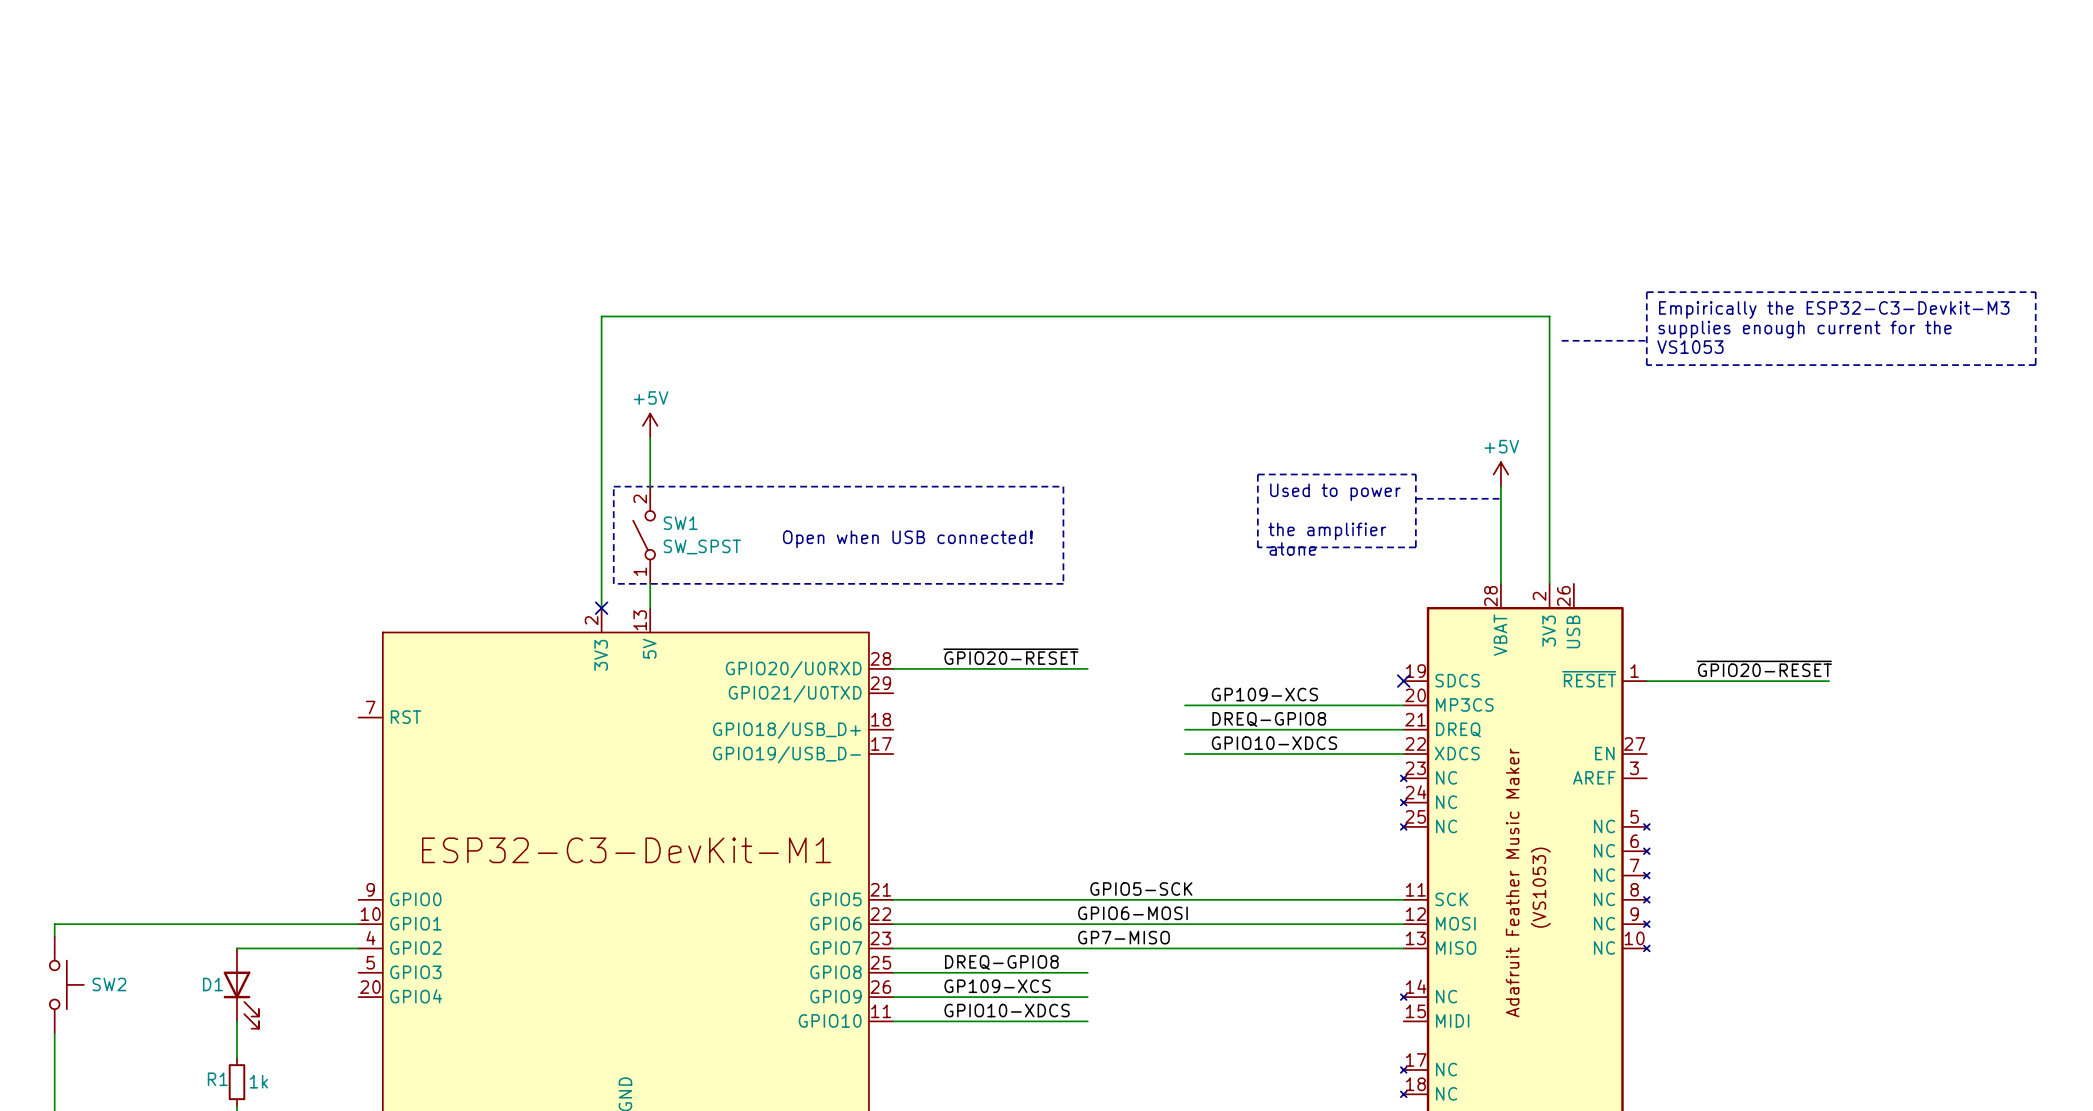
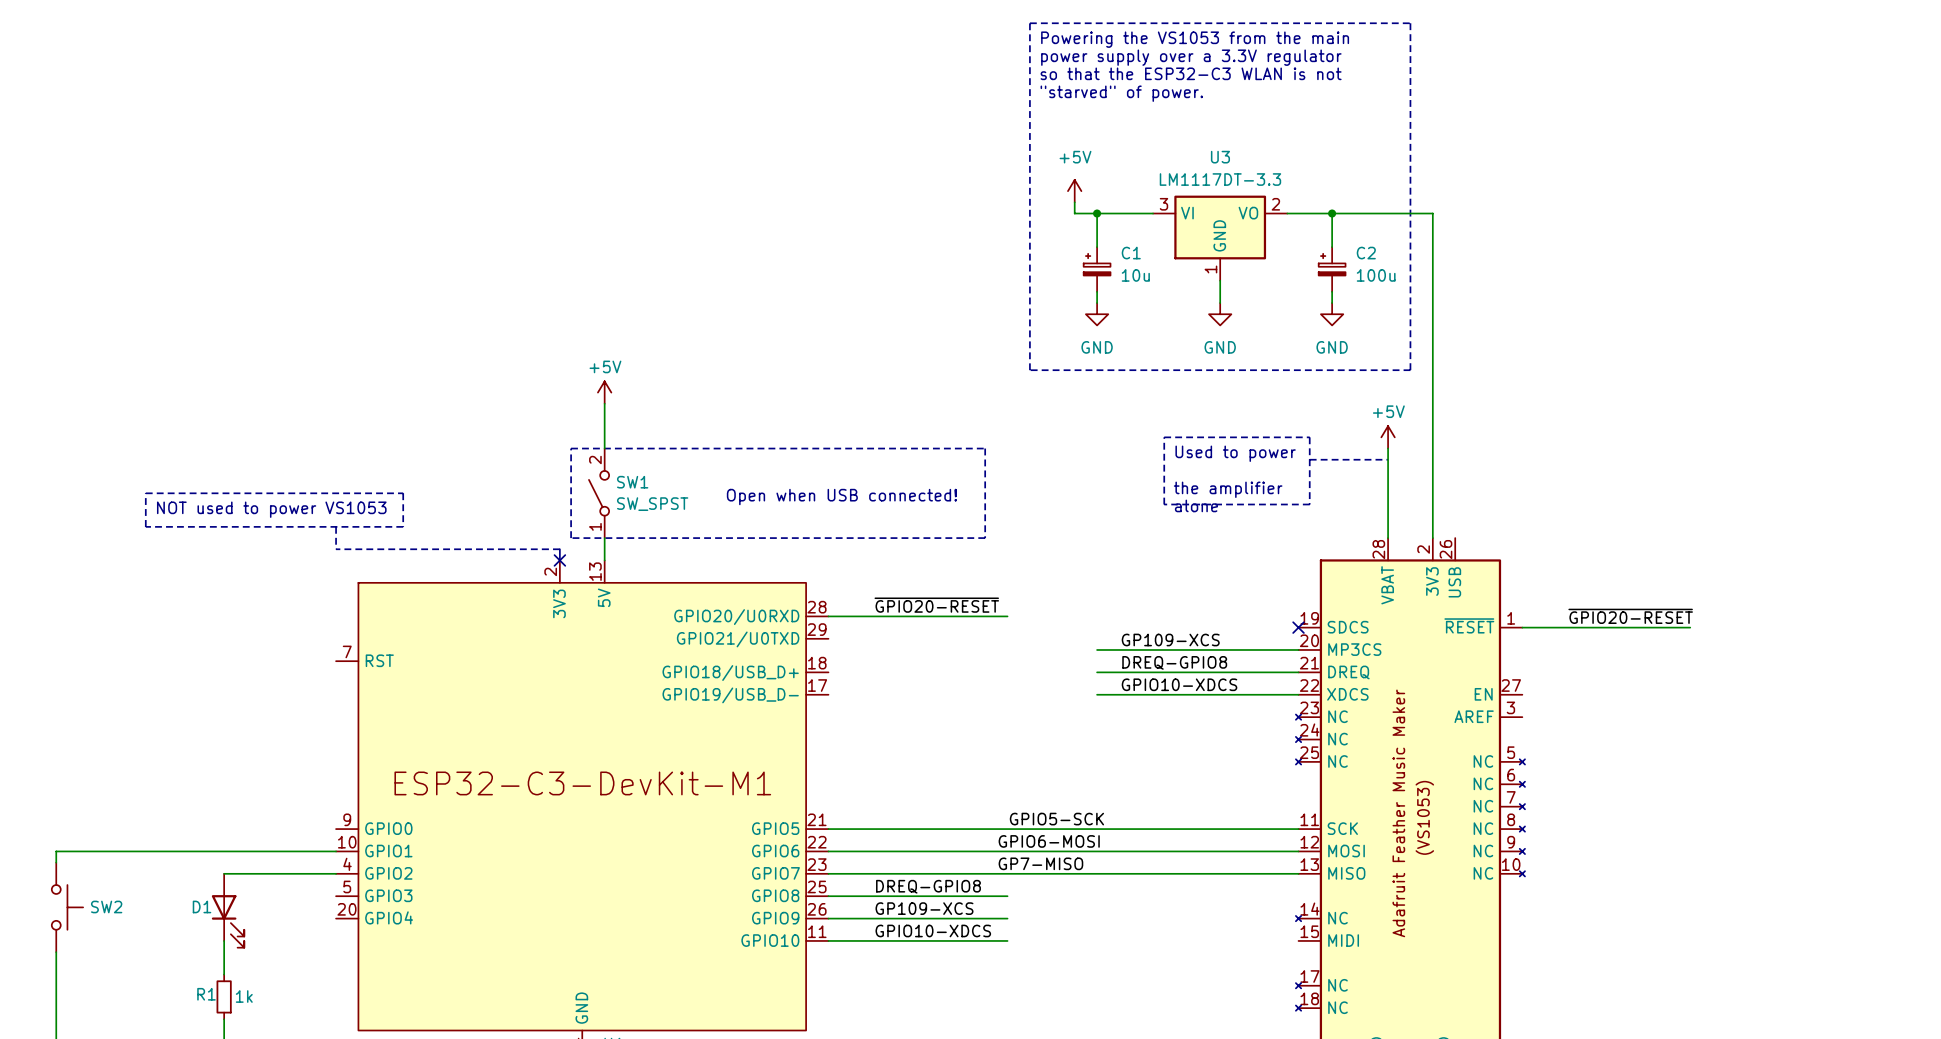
line: none -> (1029, 23) (1410, 23) (1410, 370) (1029, 370) (1029, 23)
text: none -> Powering the VS1053 from the main (1195, 39)
text: none -> power supply over a 3.3V regulator (1191, 57)
text: none -> so that the ESP32-C3 WLAN is not (1191, 73)
text: none -> "starved" of power. (1121, 93)
power symbol: none -> +5V (1074, 191)
wire: none -> (1074, 202) (1074, 213) (1153, 213)
wire: none -> (1097, 213) (1097, 247)
junction: none -> (1097, 213)
wire: none -> (1332, 213) (1332, 247)
junction: none -> (1332, 213)
U3: none -> LM1117DT-3.3 (1220, 238)
C1: none -> 10u (1097, 269)
C2: none -> 100u (1332, 269)
line: (1646, 292) (2035, 292) (2035, 365) (1646, 365) (1646, 292) -> none
wire: none -> (1220, 280) (1220, 303)
text: Empirically the ESP32-C3-Devkit-M3 (1834, 309) -> none
wire: none -> (1097, 291) (1097, 303)
wire: none -> (1332, 291) (1332, 303)
wire: (1549, 316) (601, 316) (601, 608) -> (1432, 291) (1432, 213) (1287, 213)
text: supplies enough current for the (1805, 329) -> none
power symbol: none -> GND (1097, 314)
power symbol: none -> GND (1220, 314)
power symbol: none -> GND (1332, 314)
line: (1561, 340) (1646, 340) -> none
text: VS1053 (1690, 347) -> none
line: none -> (145, 493) (403, 493) (403, 526) (145, 526) (145, 493)
text: none -> NOT used to power VS1053 (271, 509)
line: none -> (336, 526) (336, 549) (559, 549) (559, 560)

